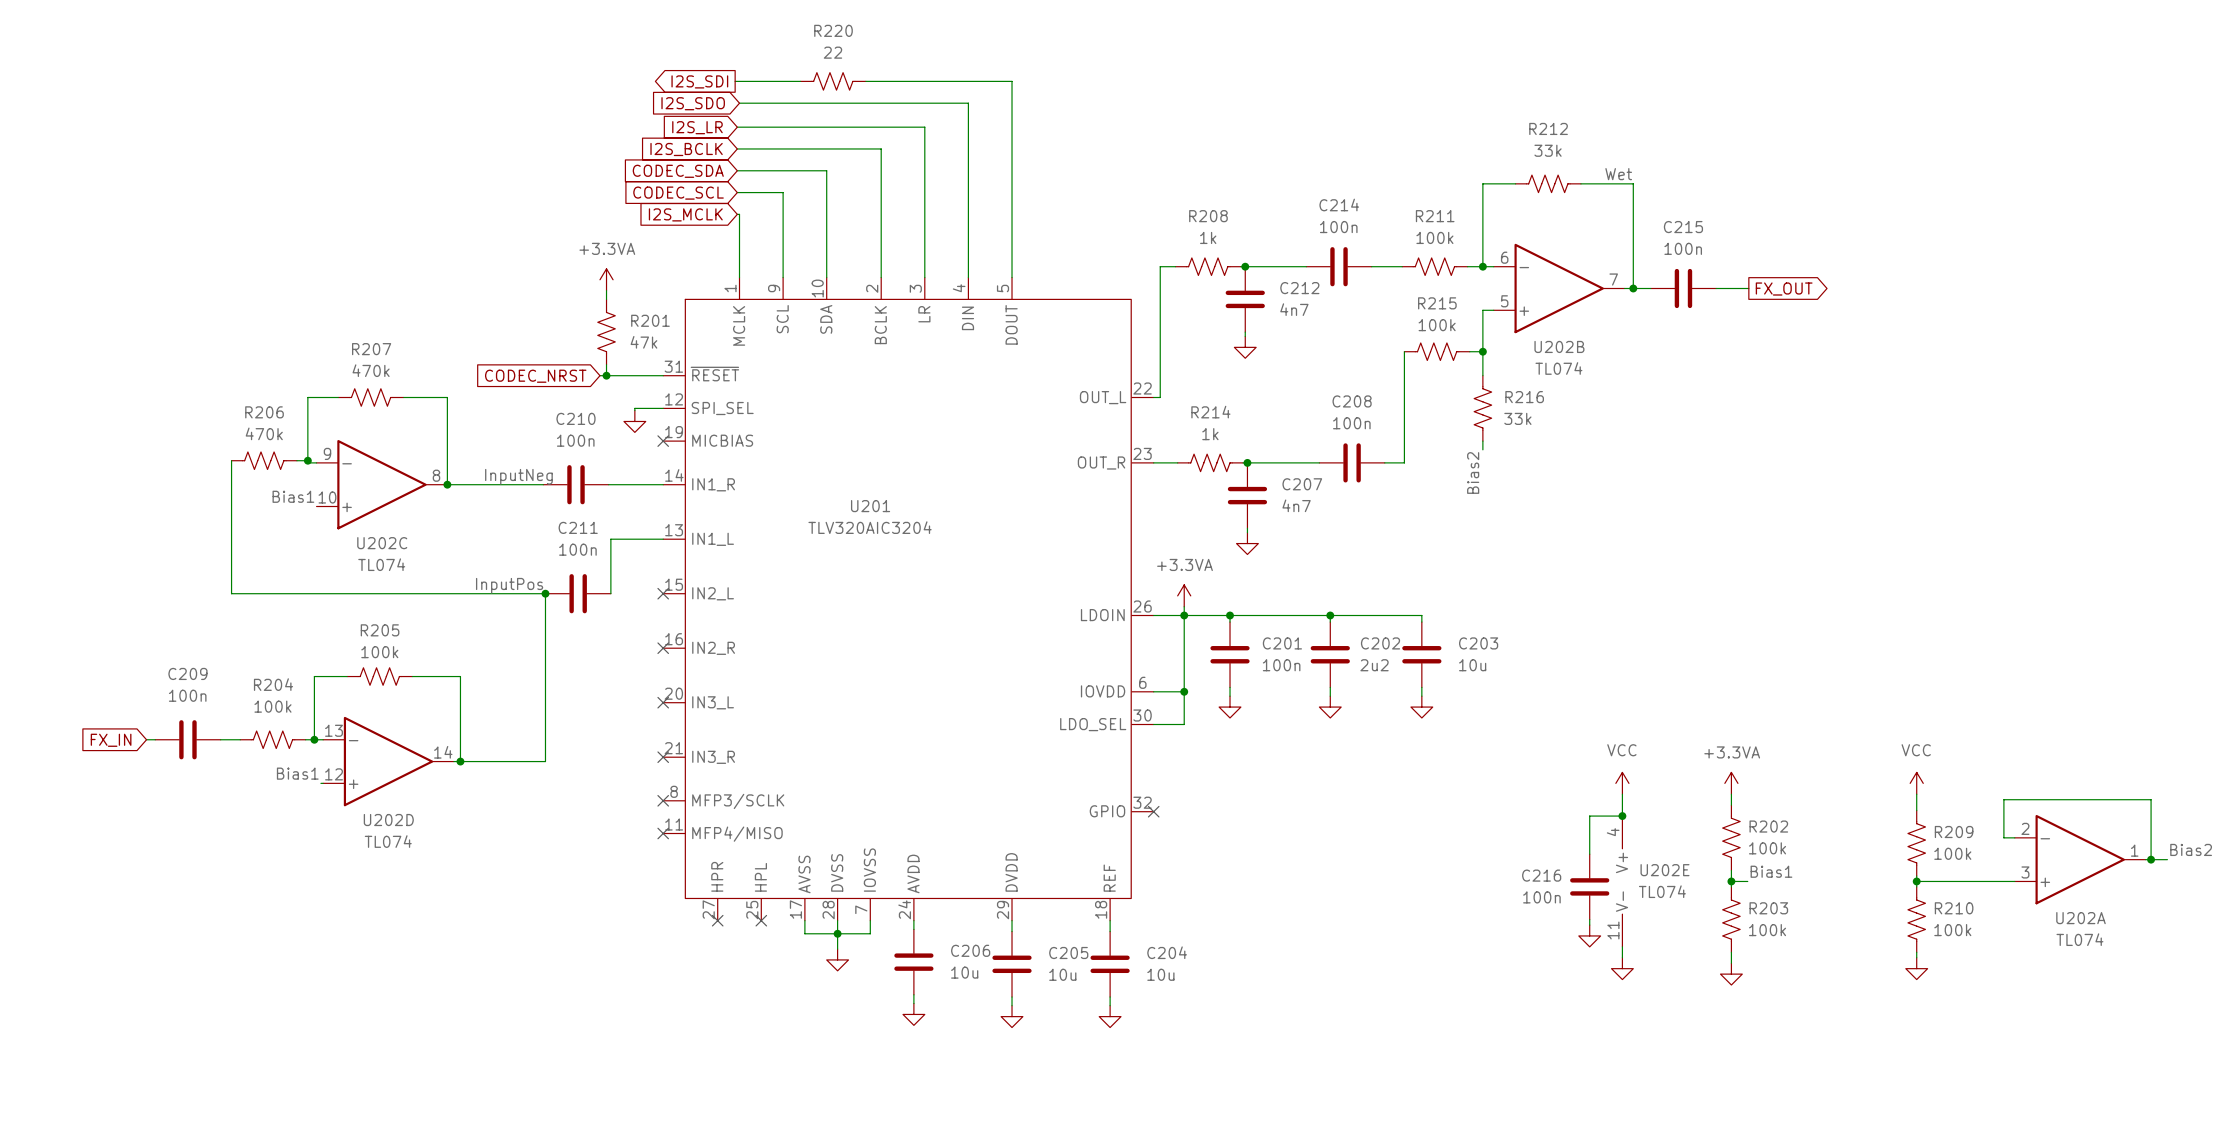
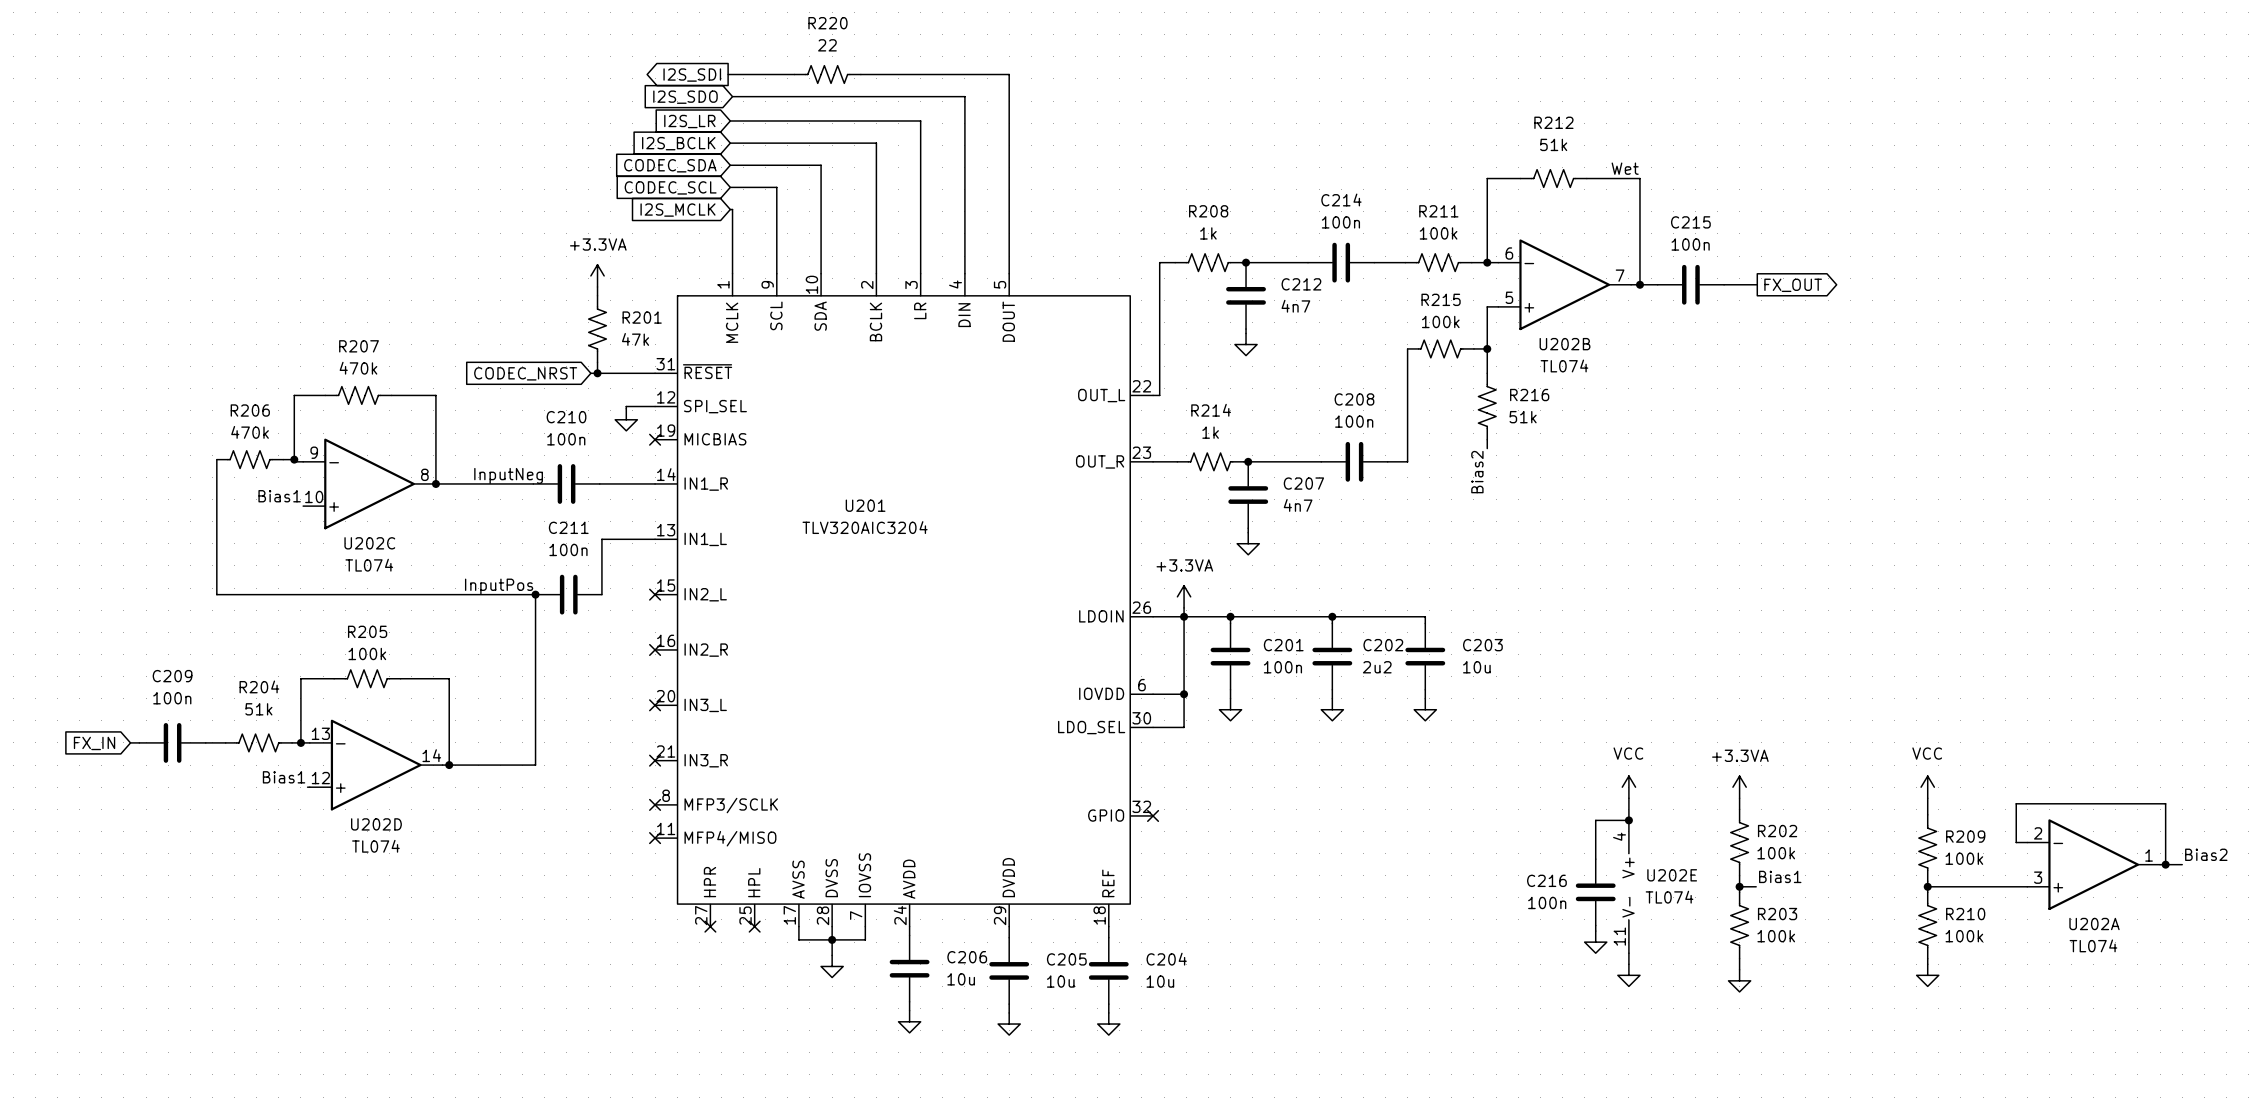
R212 value: 33k (1548, 150) -> 51k (1553, 144)
R216 value: 33k (1517, 418) -> 51k (1523, 417)
R204 value: 100k (272, 706) -> 51k (258, 709)

